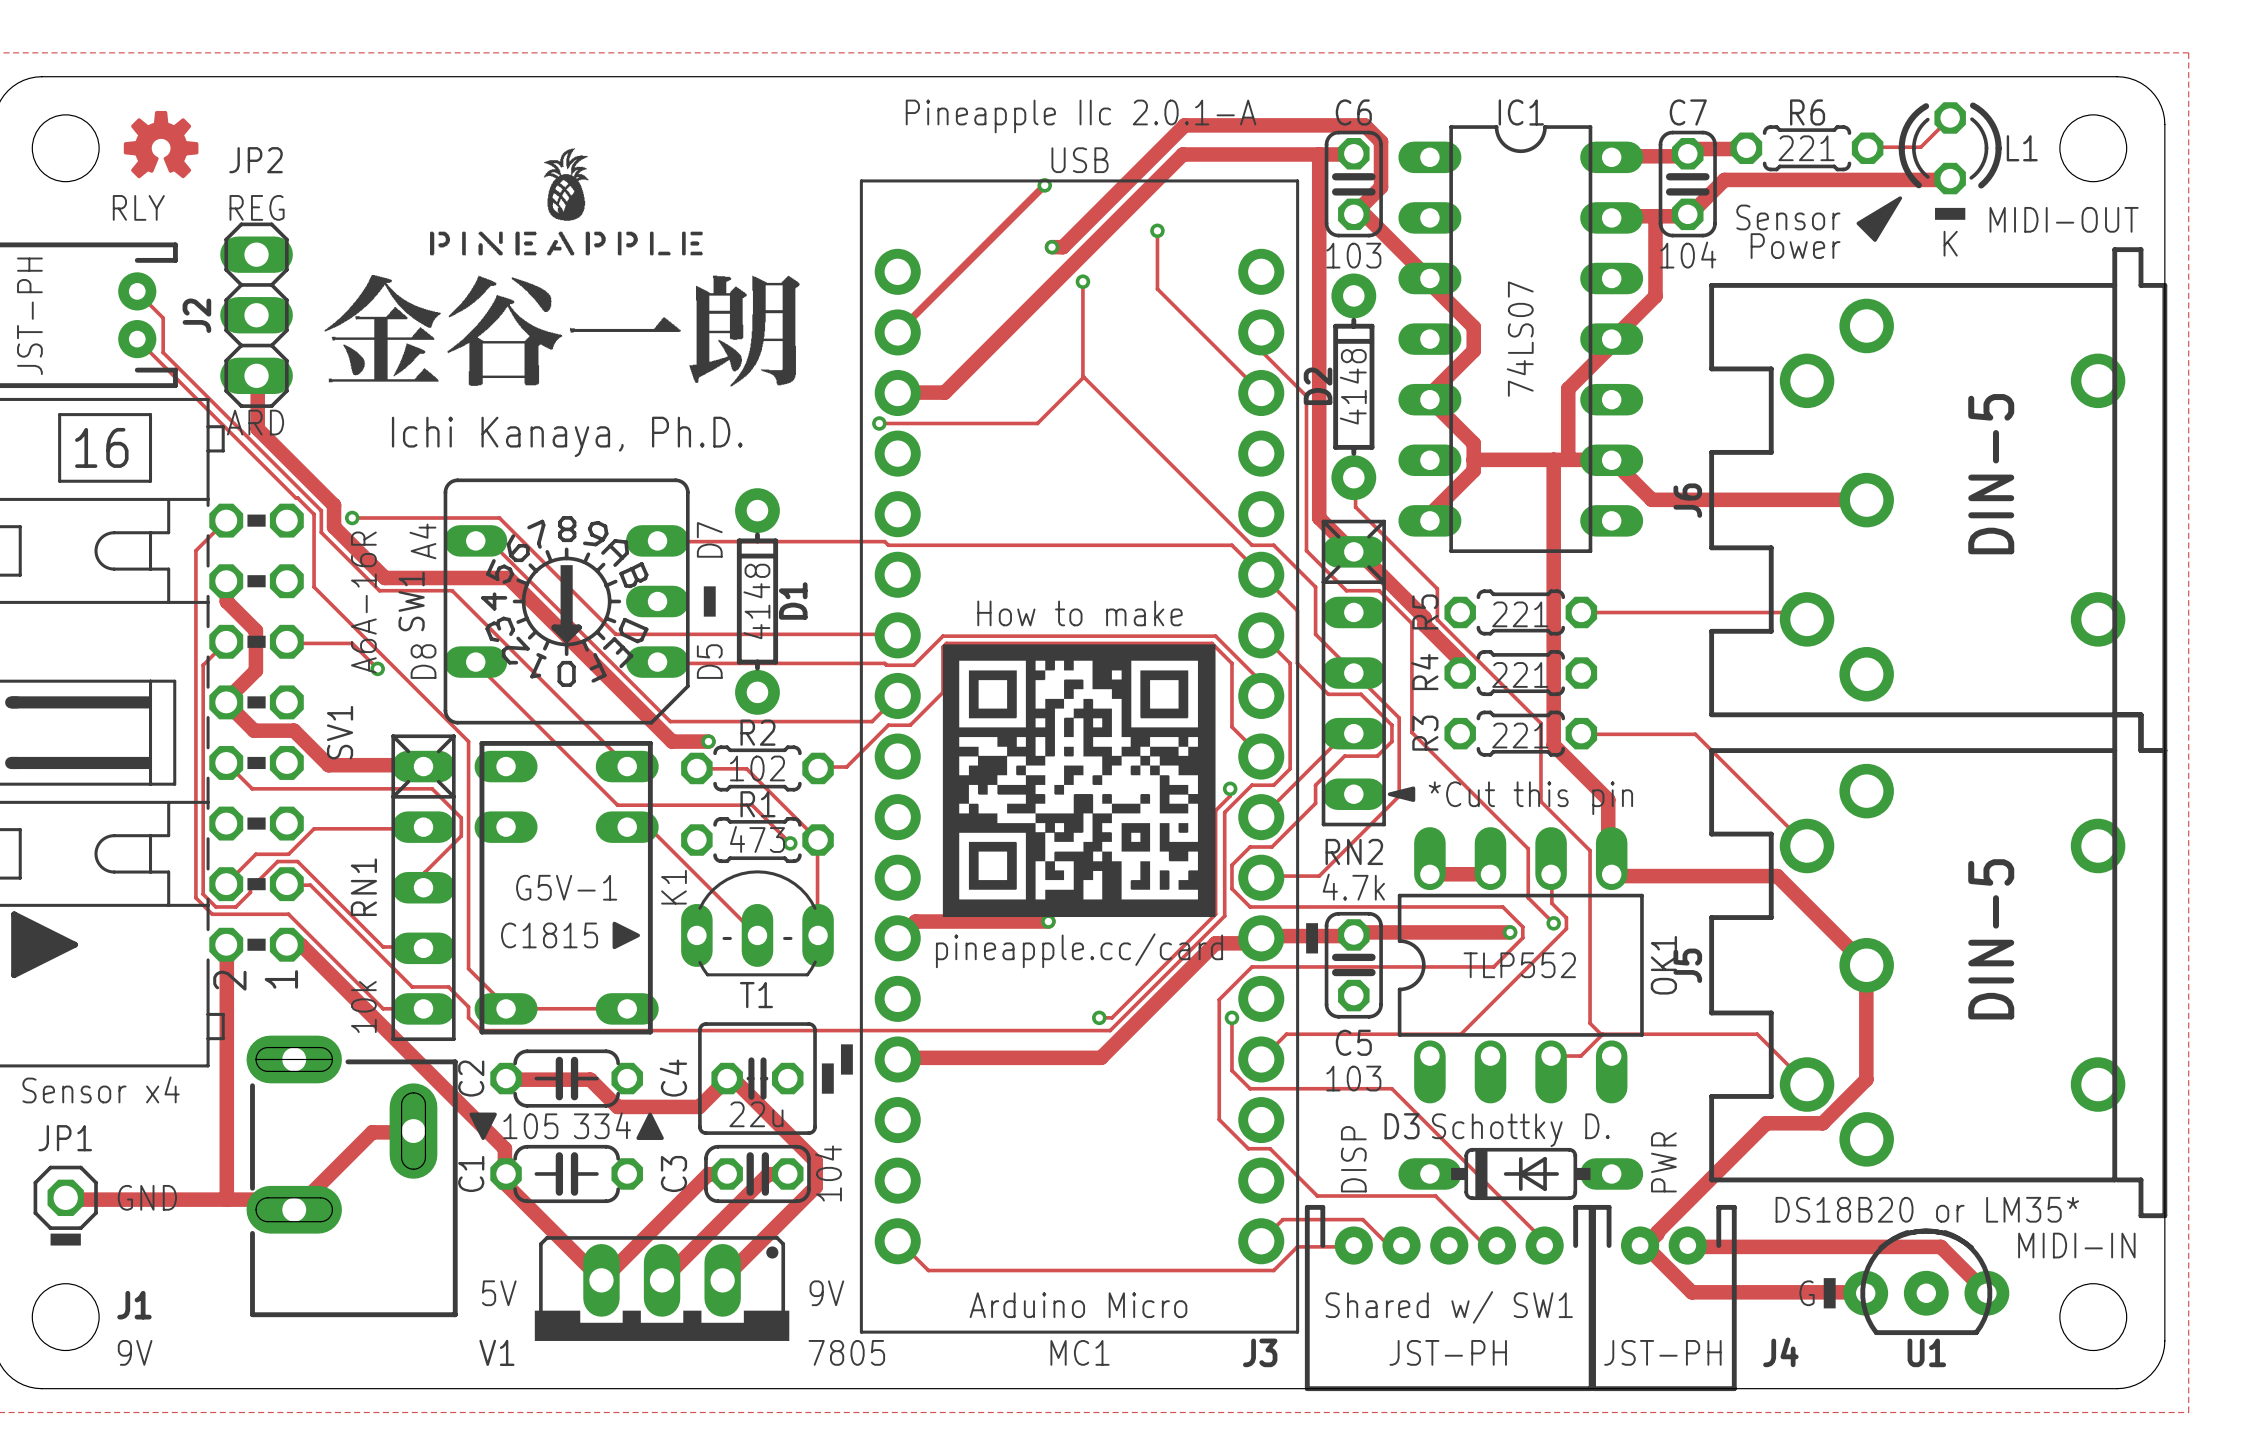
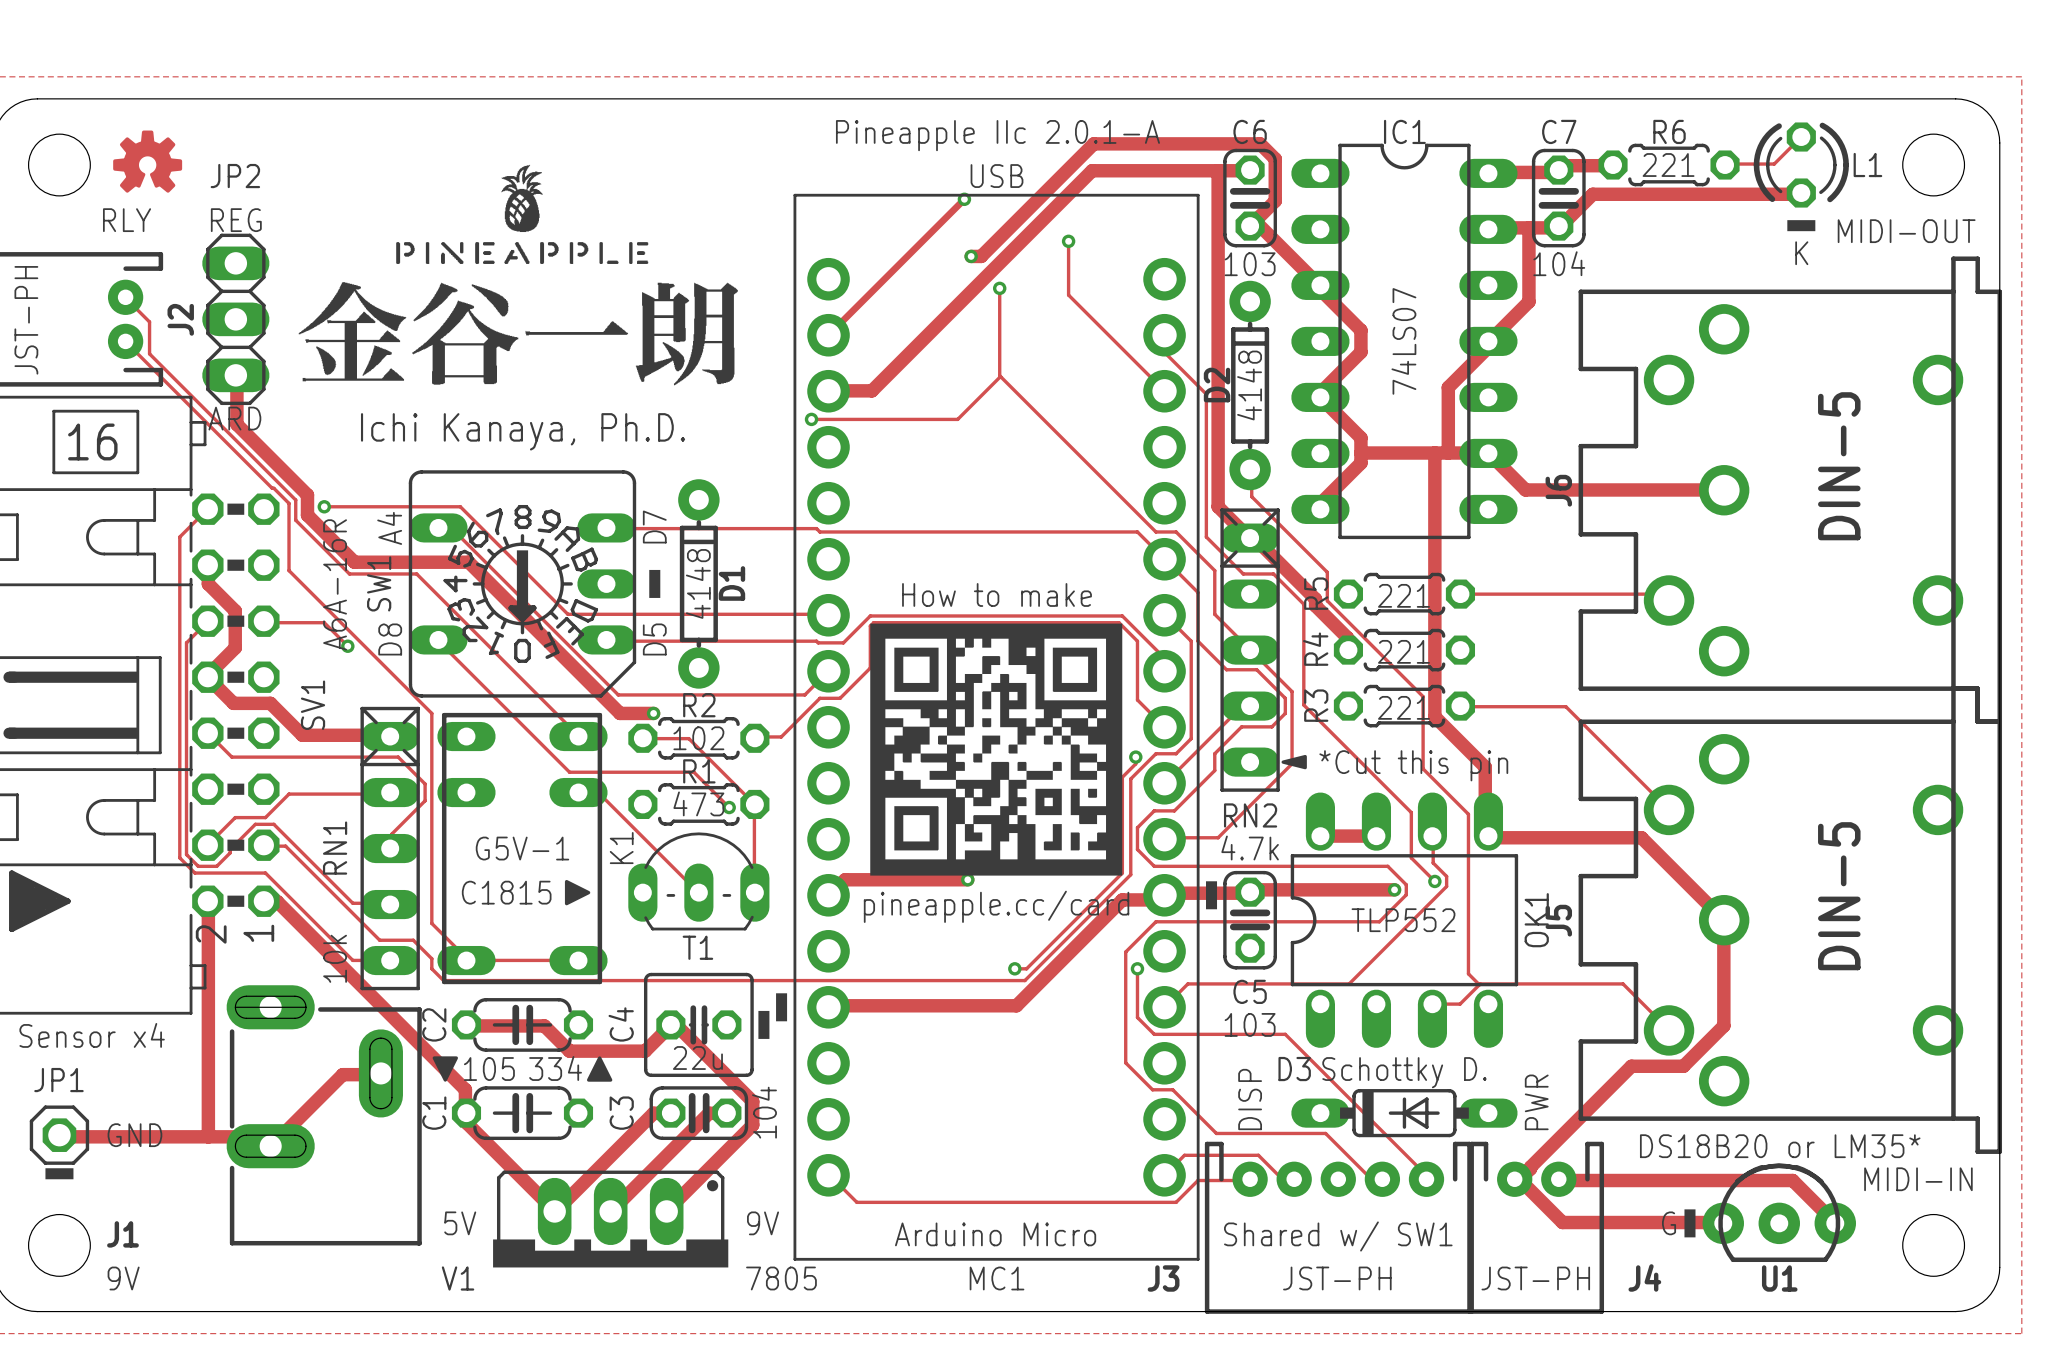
drawing: [1856, 196, 1903, 242] -> none
text: Sensor (1788, 217) -> none
text: Power (1795, 246) -> none

